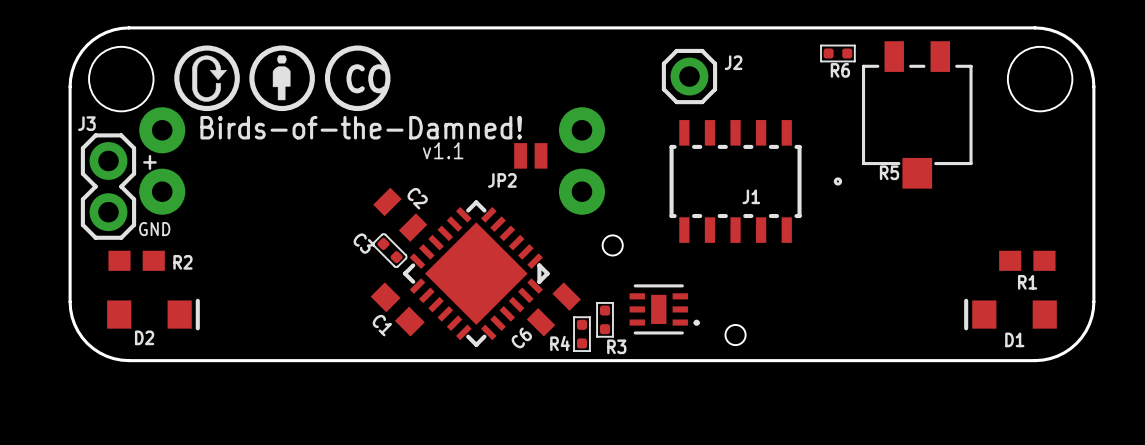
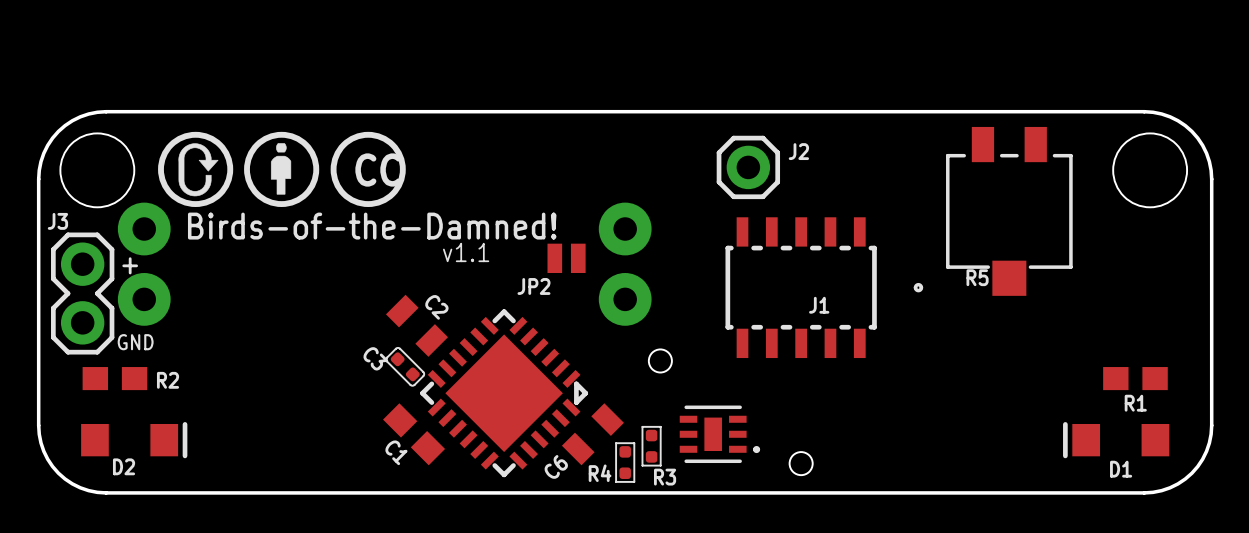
R6: (837, 53) -> none

